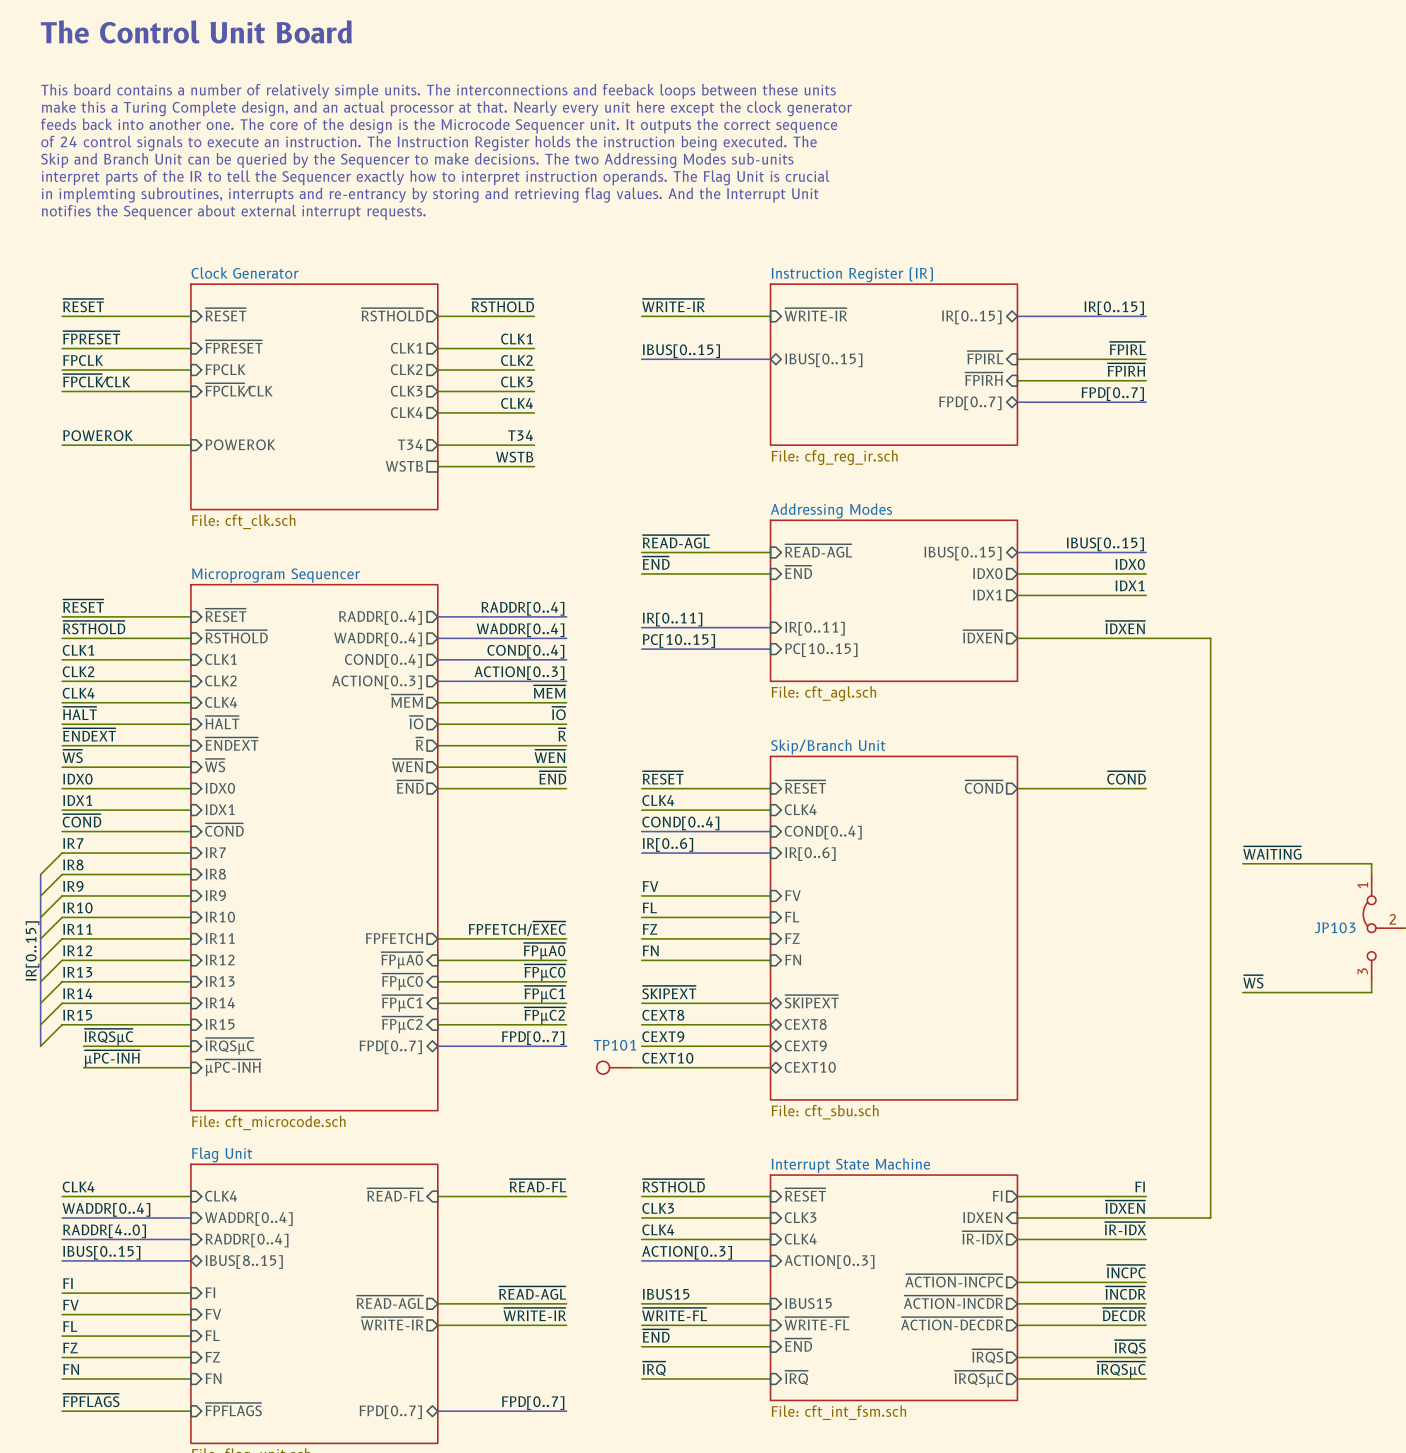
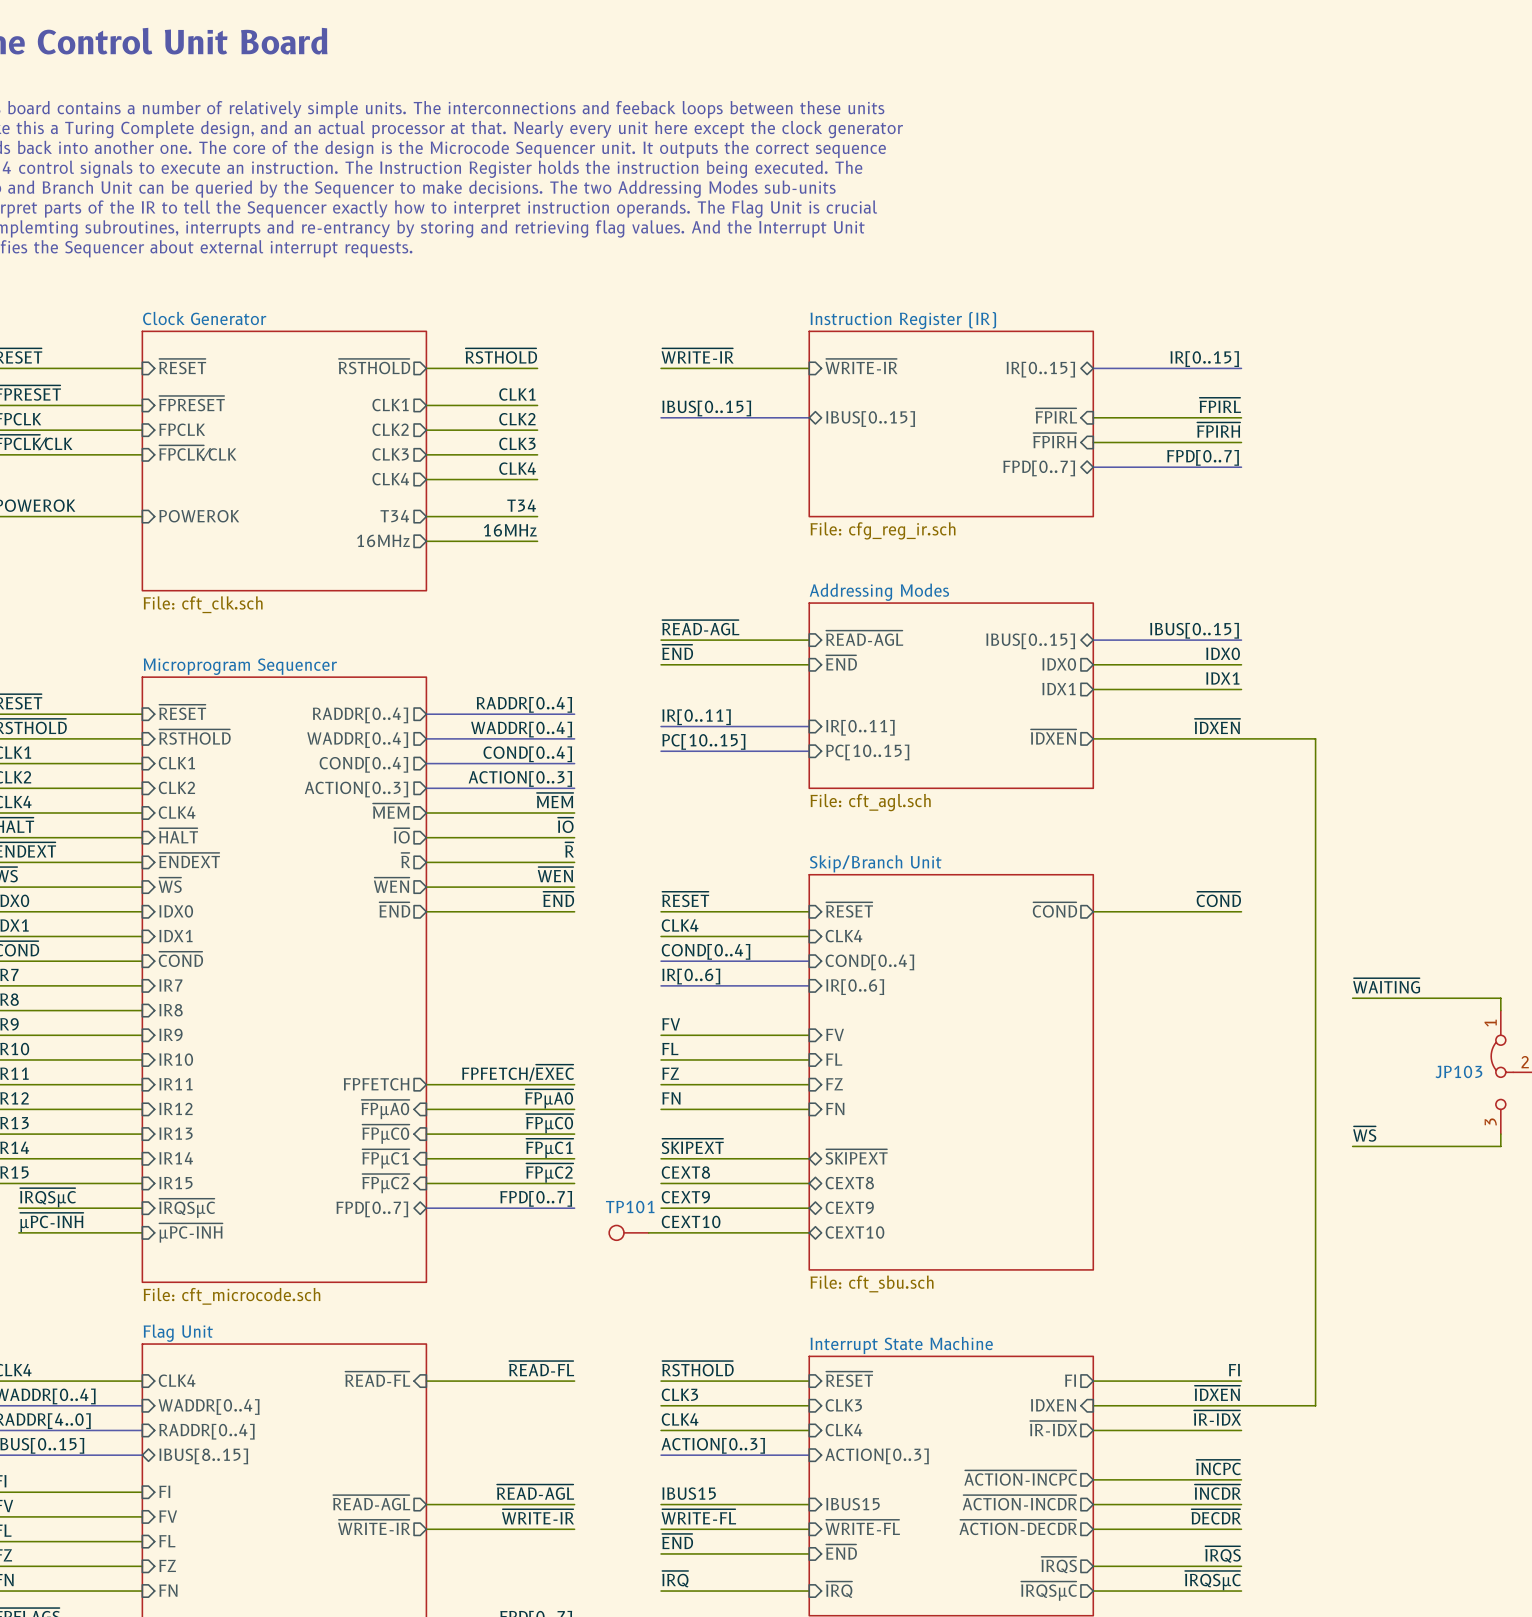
label: WSTB (514, 457) -> 16MHz (510, 530)
sheet pin shape: passive (404, 466) -> output (383, 540)
sheet pin: WSTB (404, 466) -> 16MHz (383, 540)

